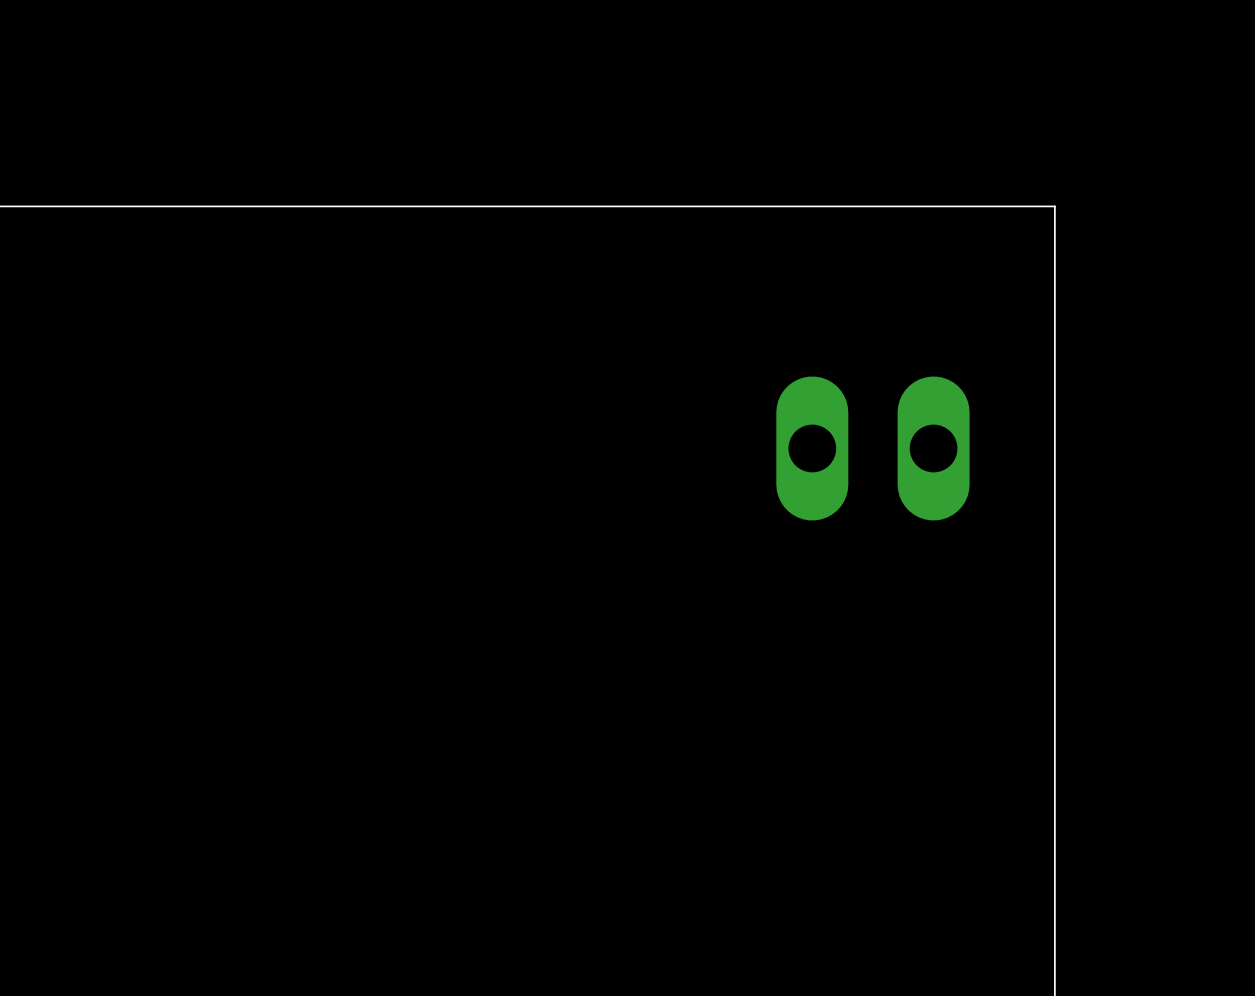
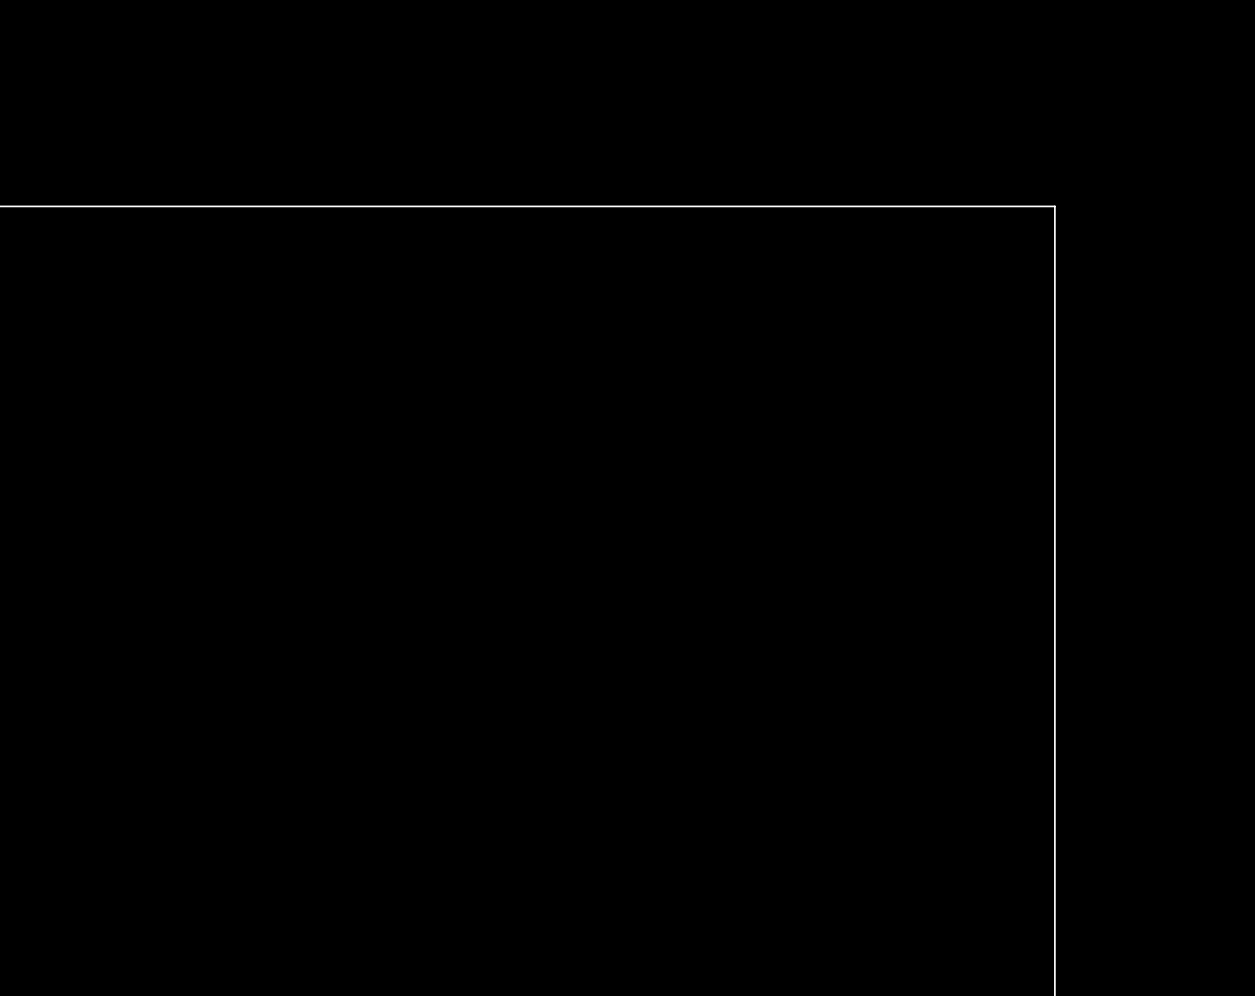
part: (872, 448) -> none

